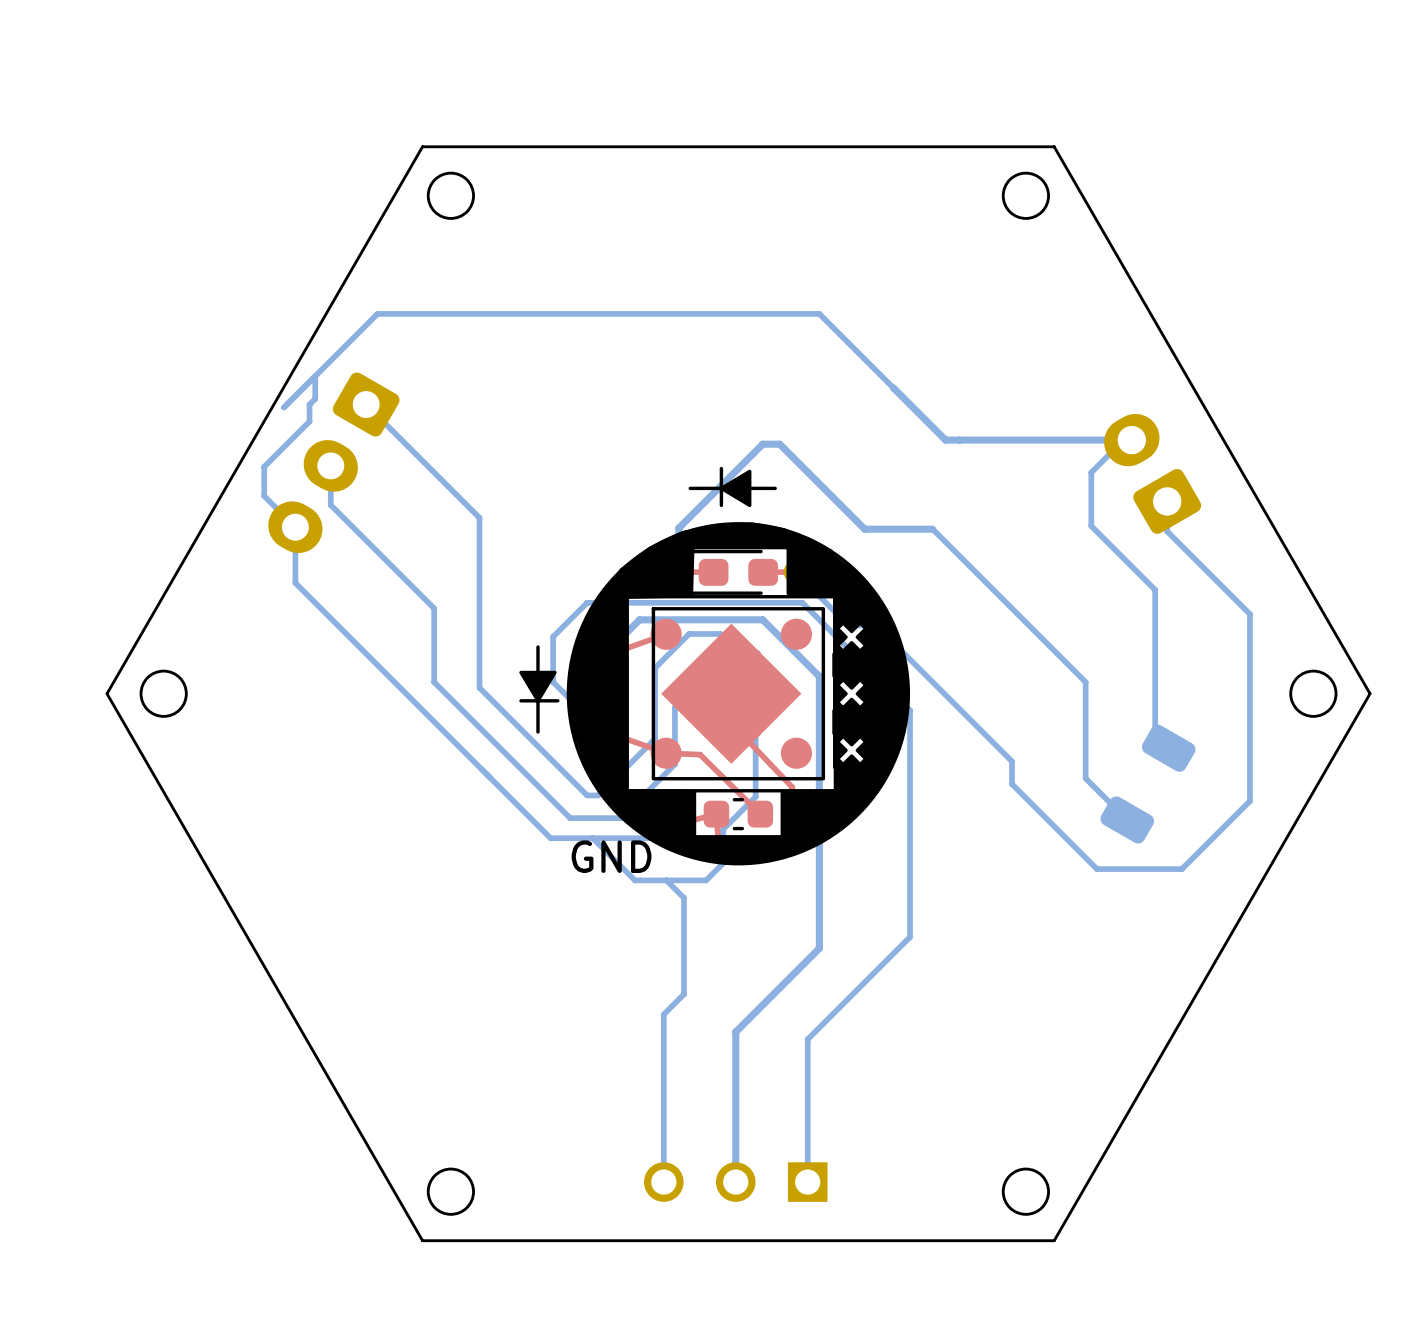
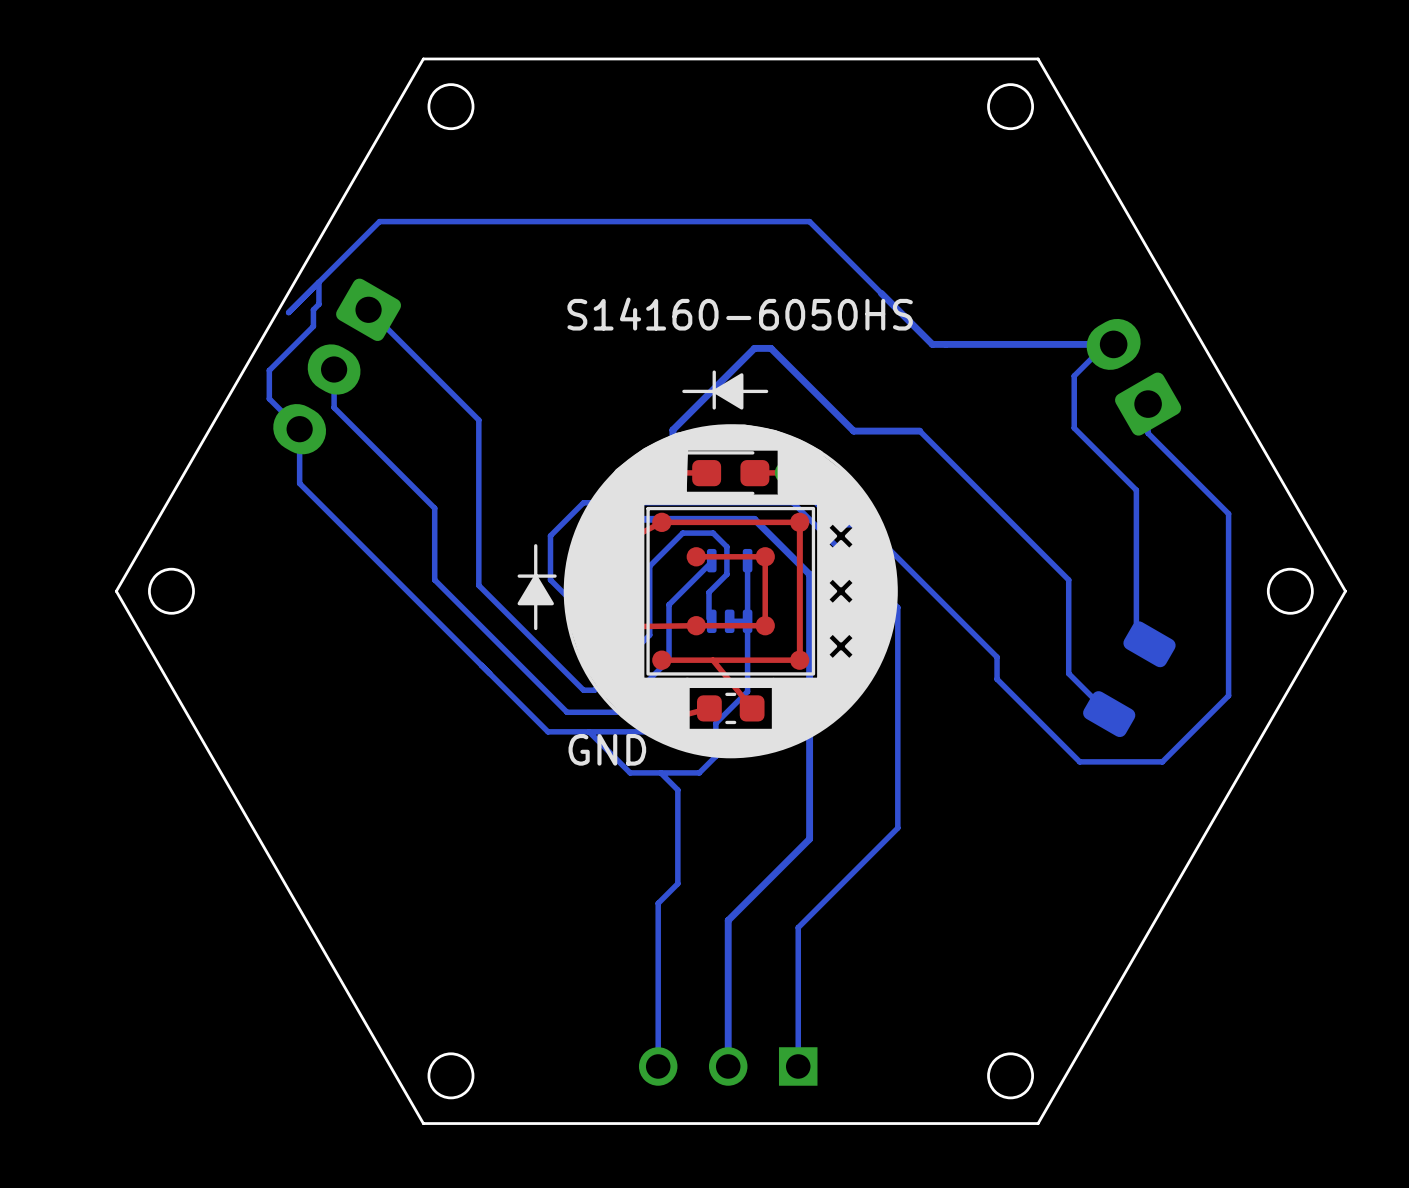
text: none -> S14160-6050HS (740, 314)
part footprint: [519, 466, 911, 866] -> [517, 370, 898, 759]

